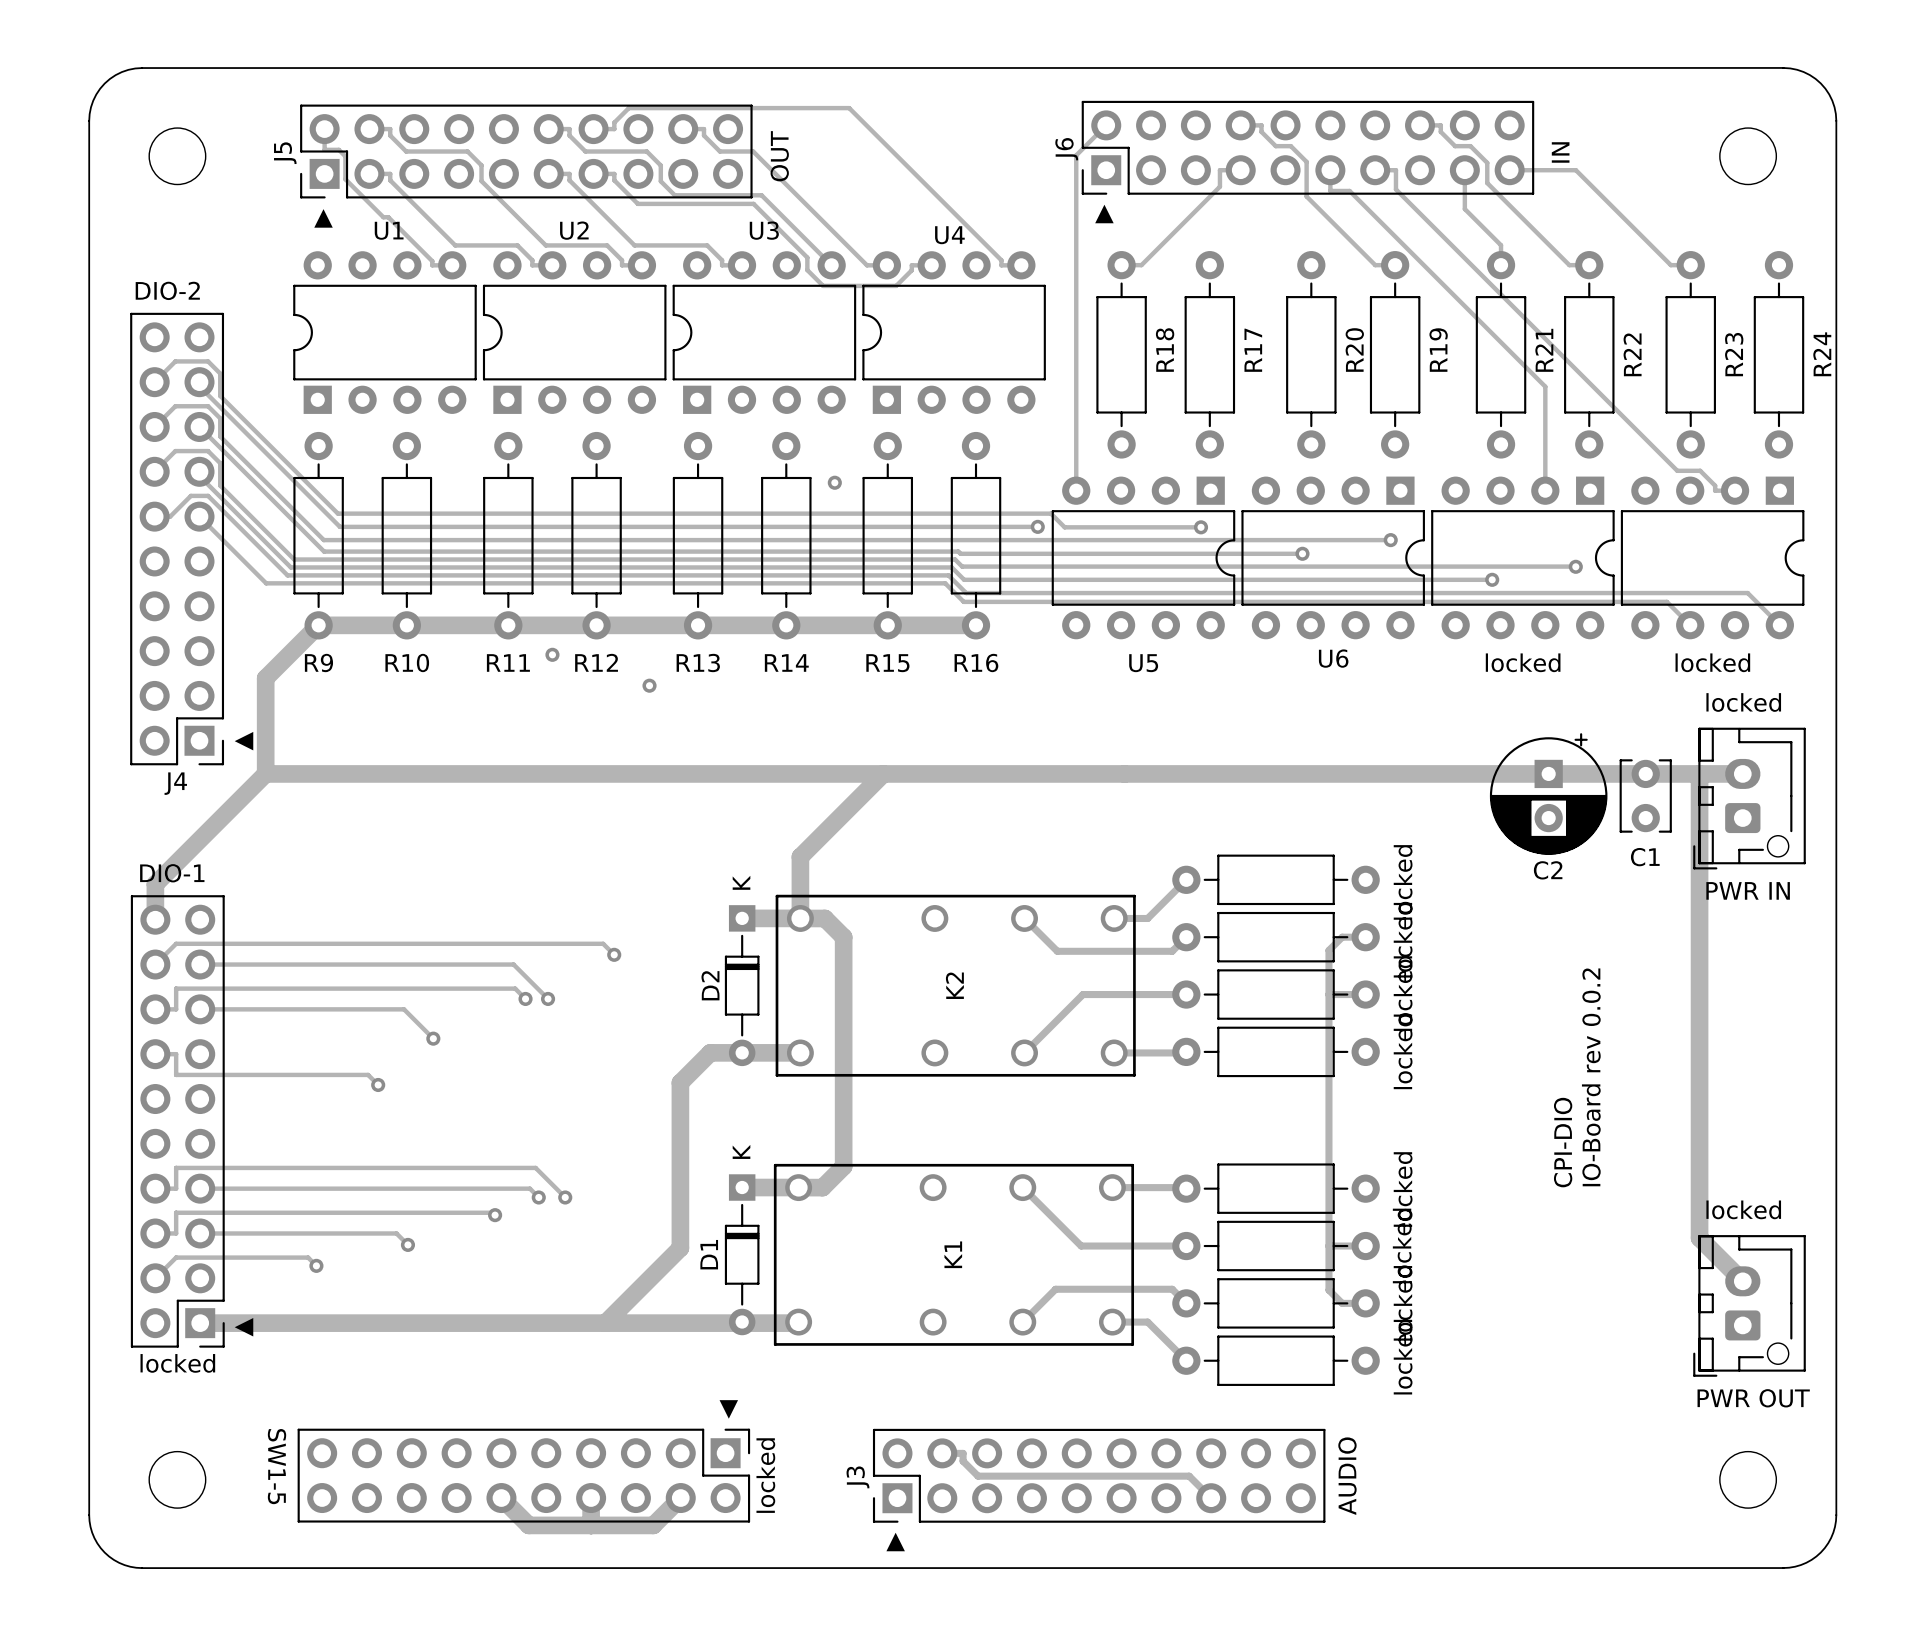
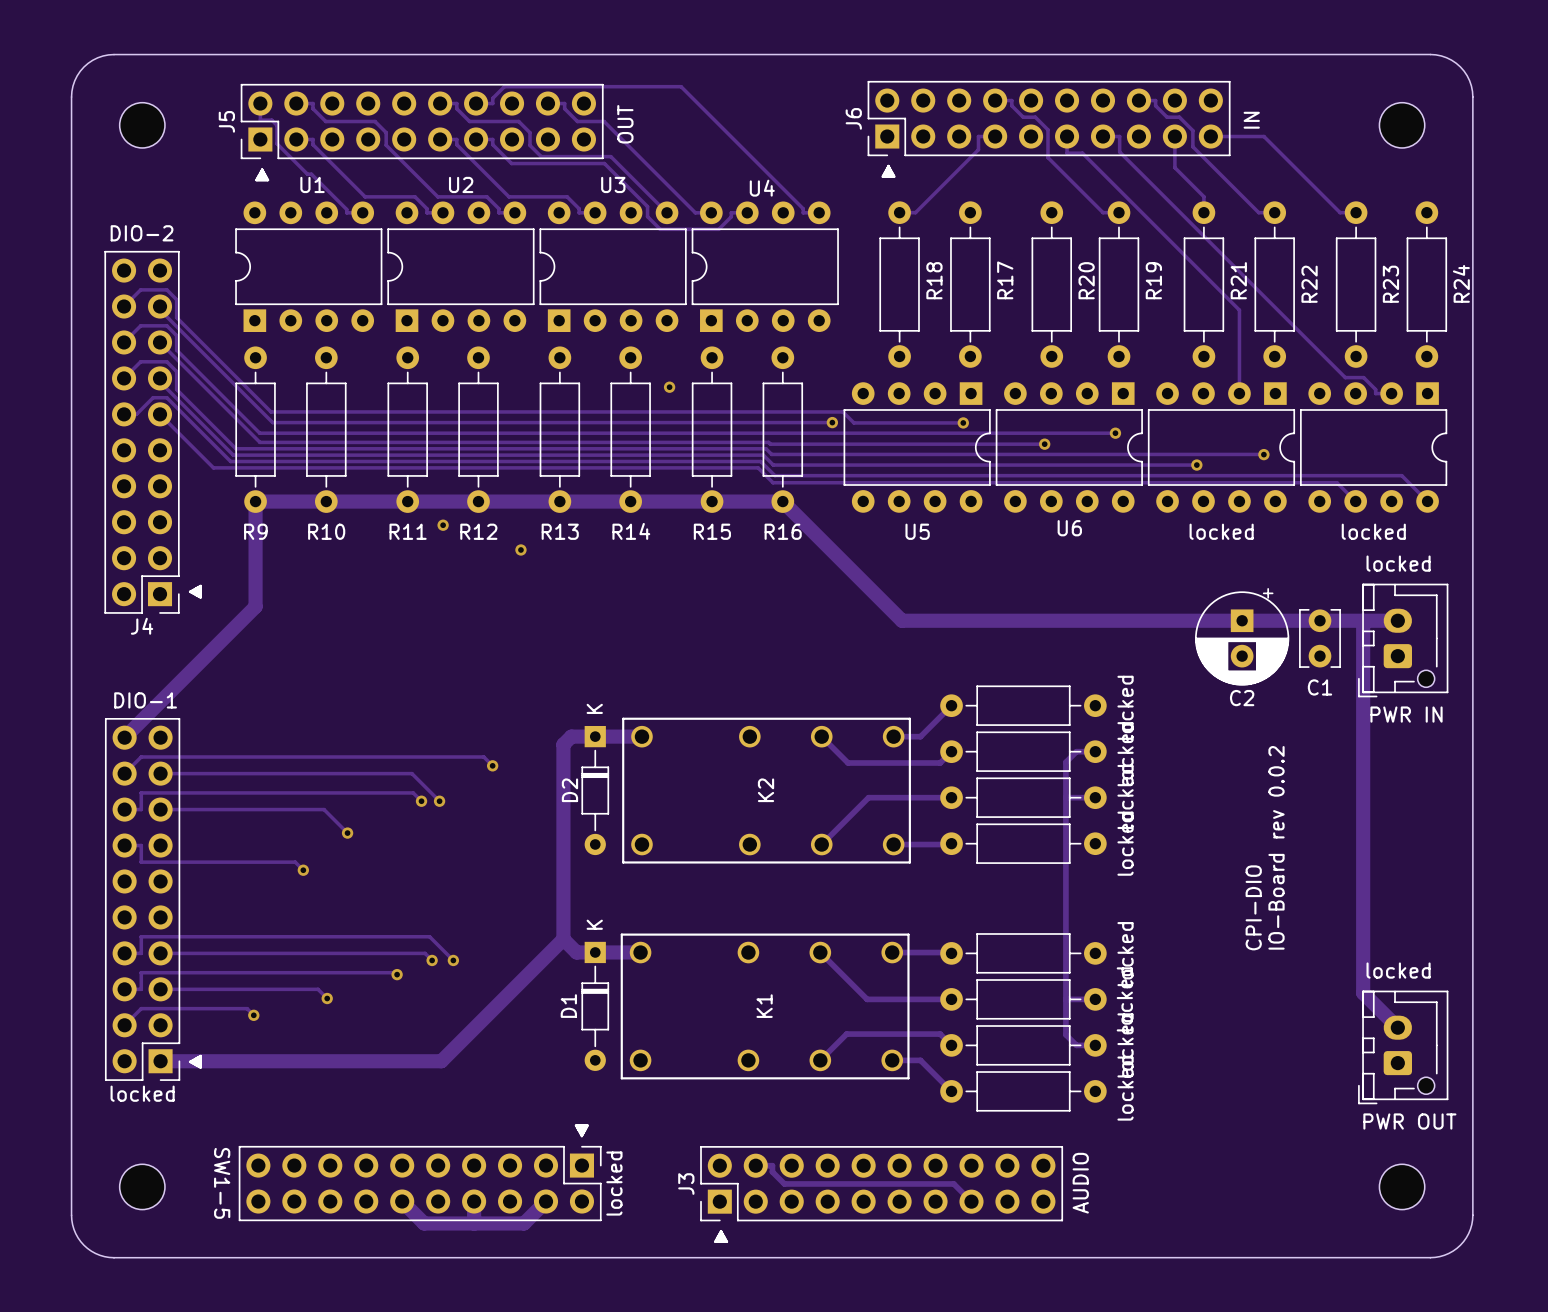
track: (1106, 125) (1076, 155) (1076, 490) -> none
track: (318, 625) (265, 678) (265, 773) -> none
track: (265, 773) (155, 884) (155, 919) -> (255, 501) (255, 606) (124, 737)
track: (265, 773) (1124, 773) -> (782, 501) (902, 620)
track: (883, 773) (800, 856) (800, 918) (824, 918) (843, 937) (843, 1166) (822, 1187) (798, 1187) -> none
track: none -> (595, 736) (571, 736) (563, 744) (563, 939)
track: (800, 1052) (710, 1052) (680, 1082) (680, 1248) (605, 1323) -> none
track: none -> (563, 939) (576, 952) (595, 952)
track: (798, 1322) (550, 1323) -> (563, 939) (441, 1061)

